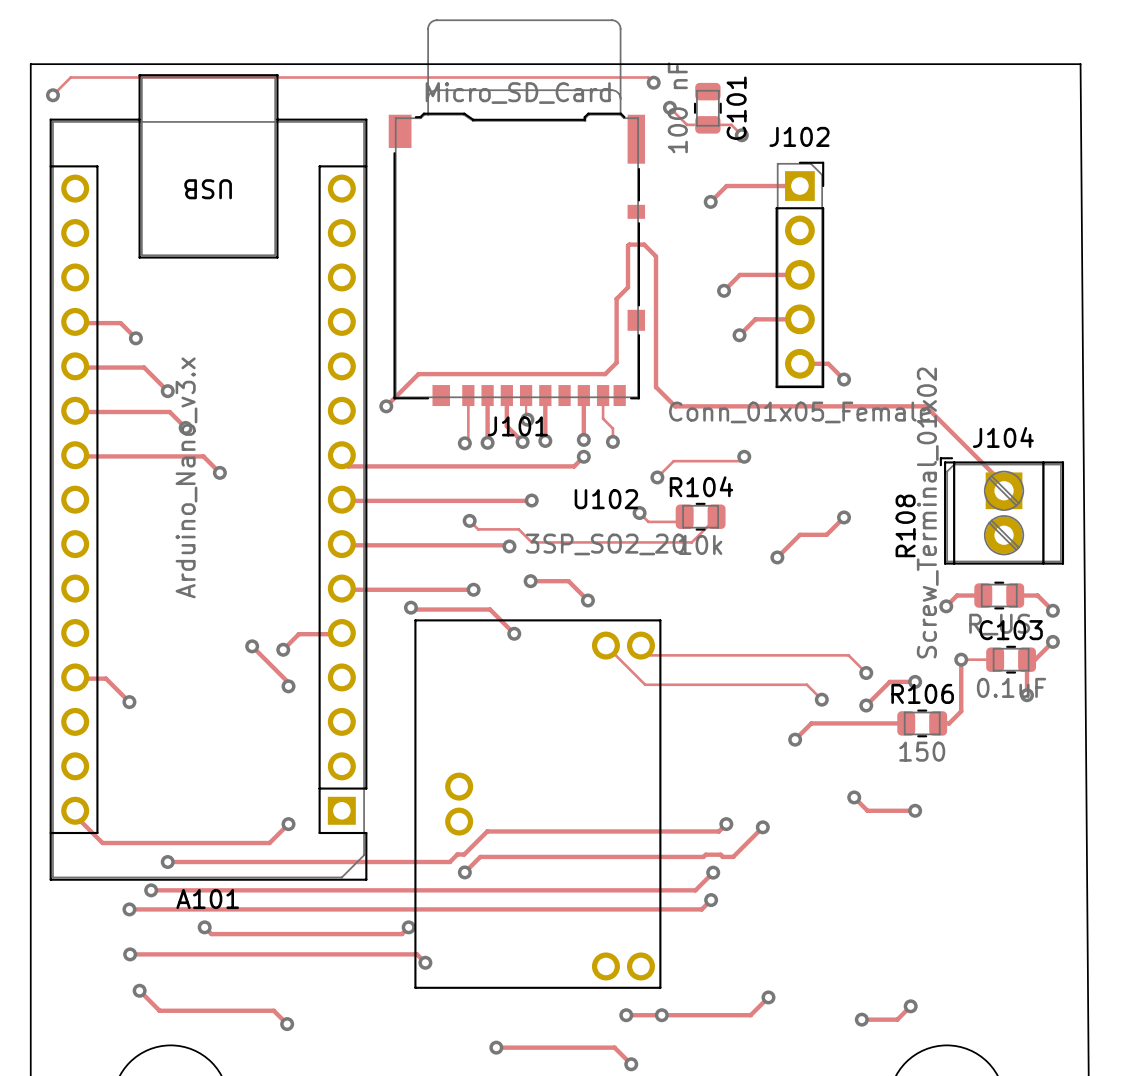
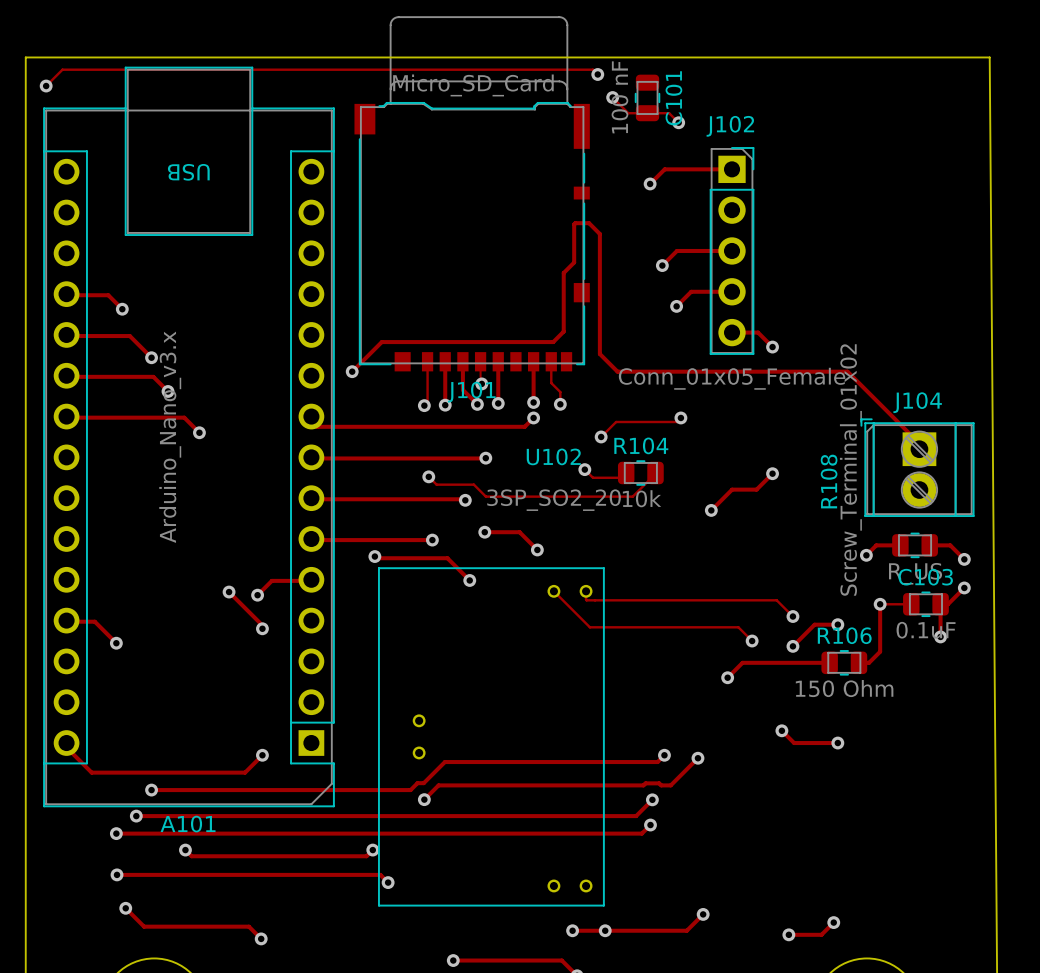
U102 footprint: [414, 619, 662, 989] -> [378, 567, 605, 907]
R106 value: 150 (922, 751) -> 150 Ohm (844, 688)

